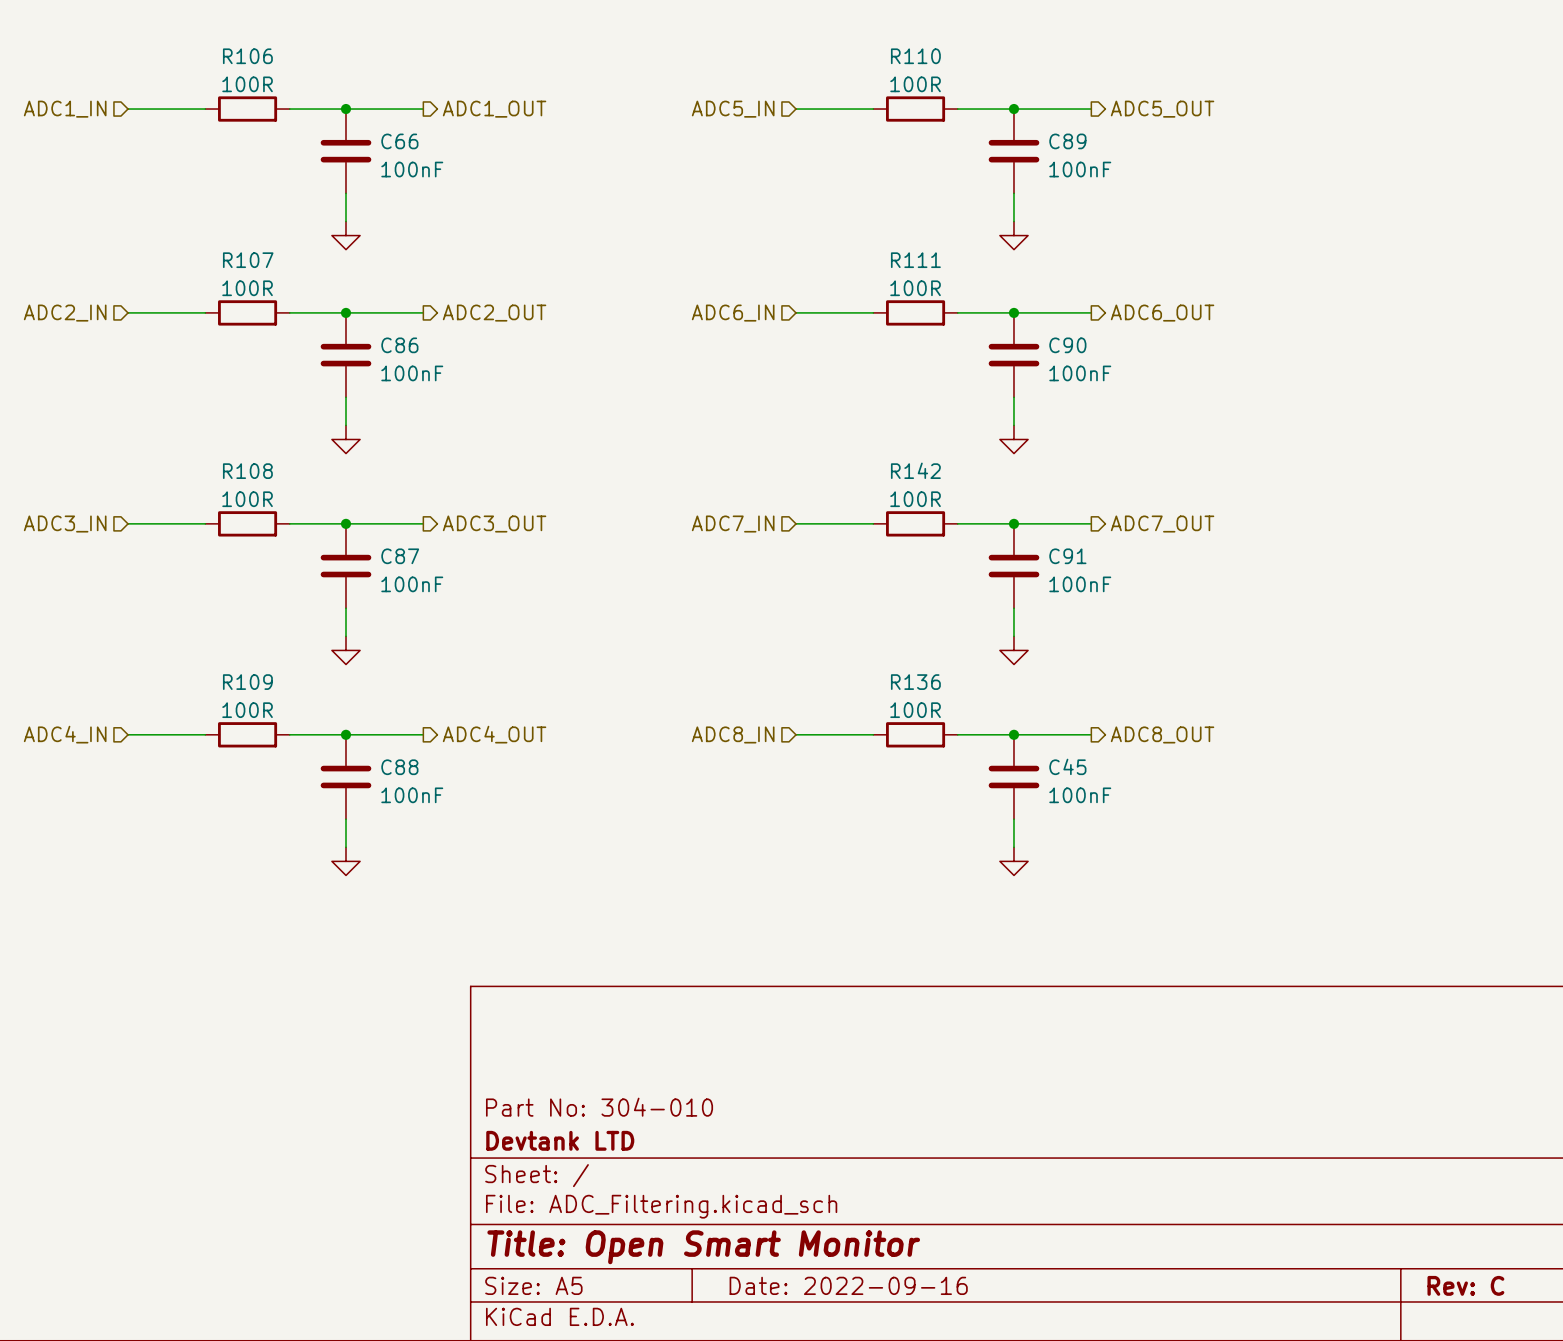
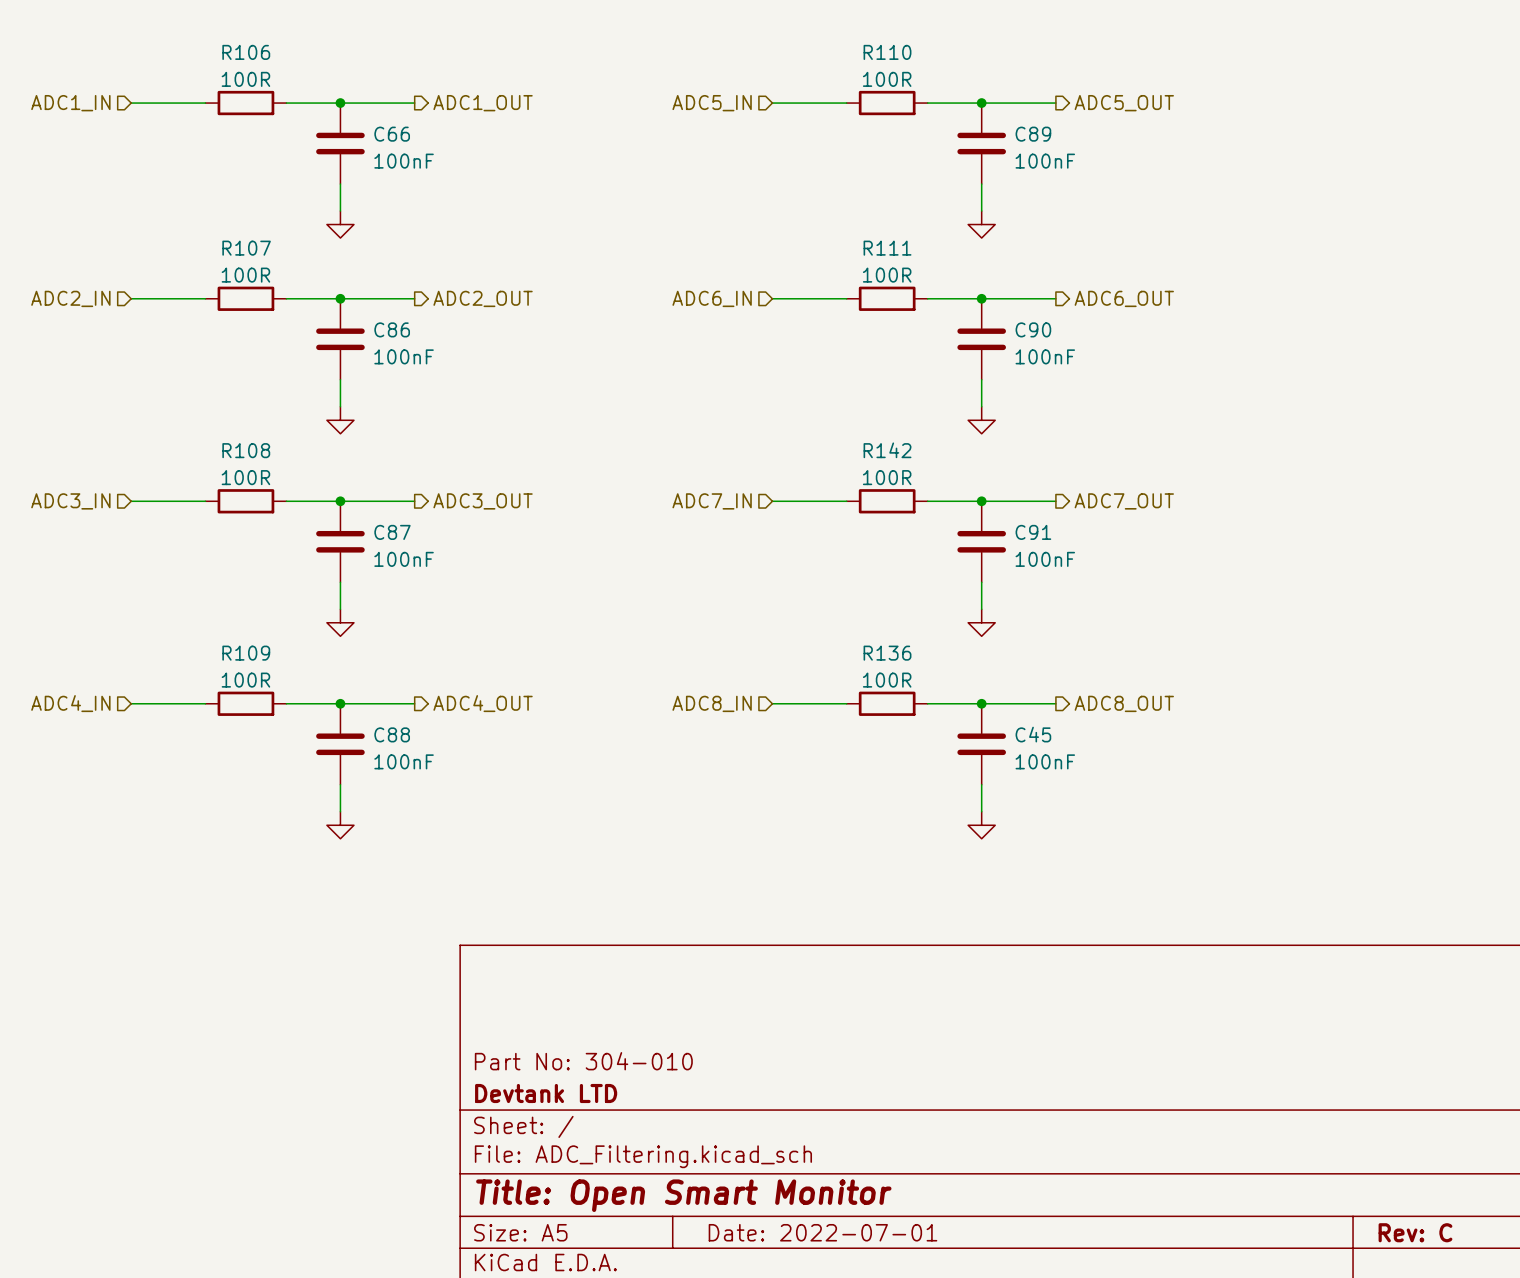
title block: Date: 2022-09-16 (848, 1285) -> Date: 2022-07-01 (822, 1232)

